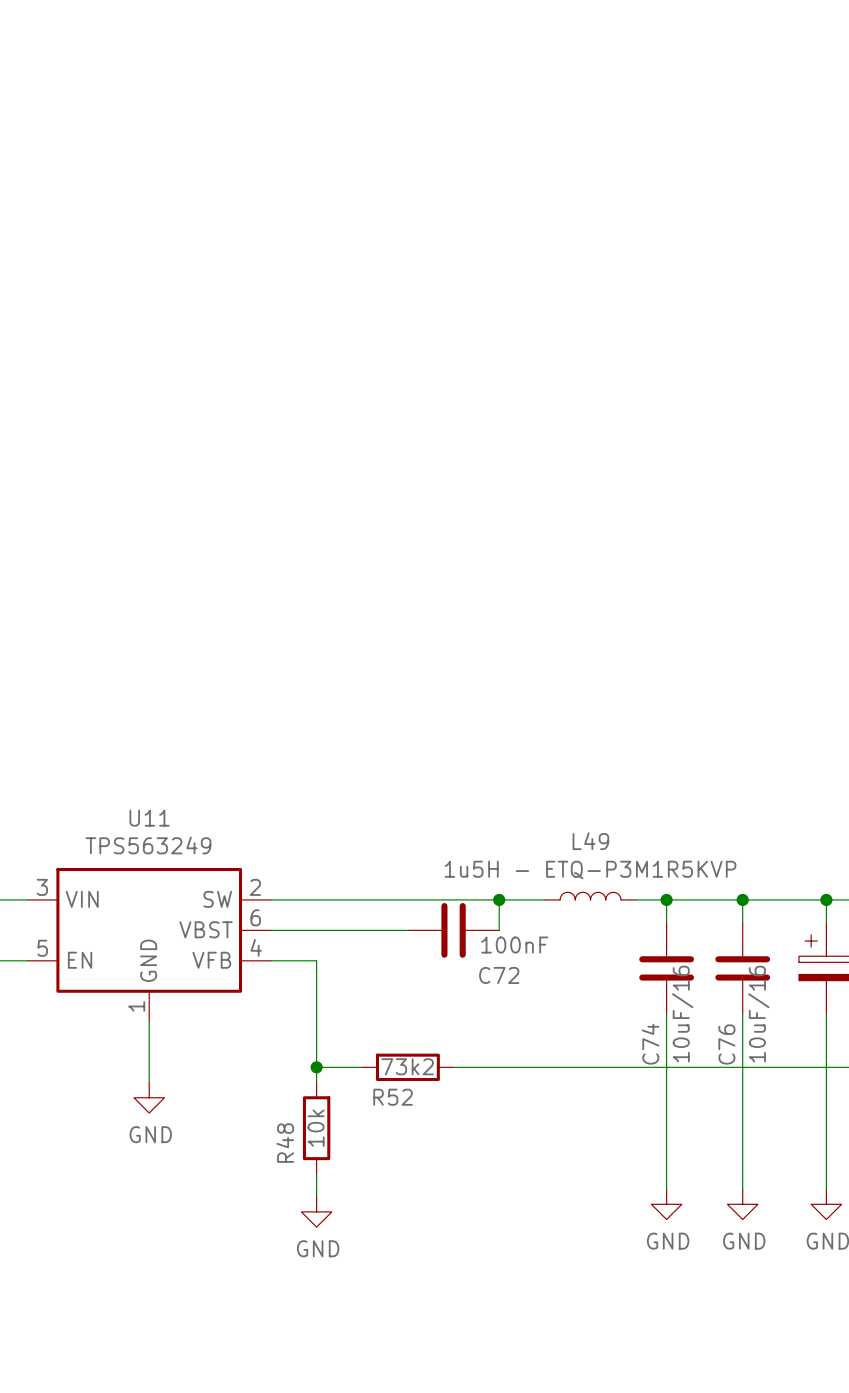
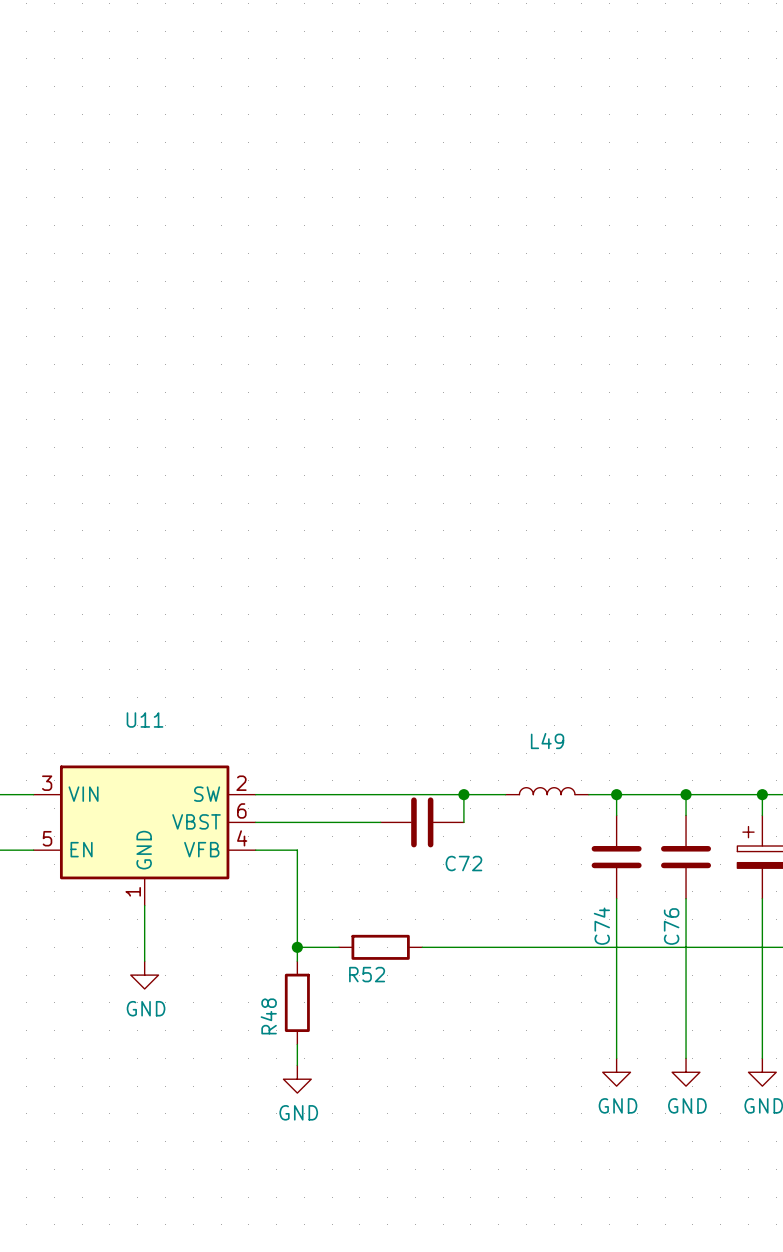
U11 value: TPS563249 (148, 845) -> none
L49 value: 1u5H - ETQ-P3M1R5KVP (590, 869) -> none
C72 value: 100nF (514, 945) -> none
C74 value: 10uF/16 (682, 1014) -> none
C76 value: 10uF/16 (758, 1014) -> none
R52 value: 73k2 (407, 1066) -> none
R48 value: 10k (316, 1128) -> none

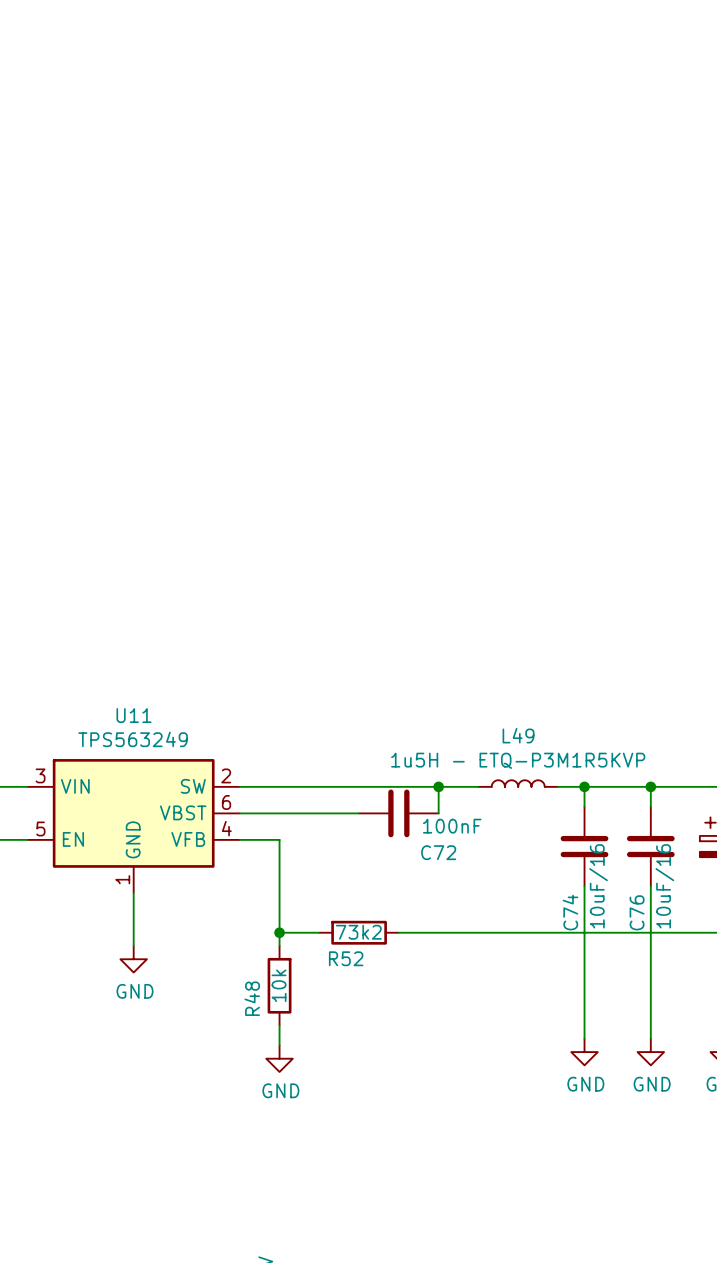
U11 value: none -> TPS563249 (133, 739)
L49 value: none -> 1u5H - ETQ-P3M1R5KVP (518, 760)
C72 value: none -> 100nF (452, 826)
C74 value: none -> 10uF/16 (598, 886)
C76 value: none -> 10uF/16 (664, 886)
R52 value: none -> 73k2 (358, 932)
R48 value: none -> 10k (279, 985)

